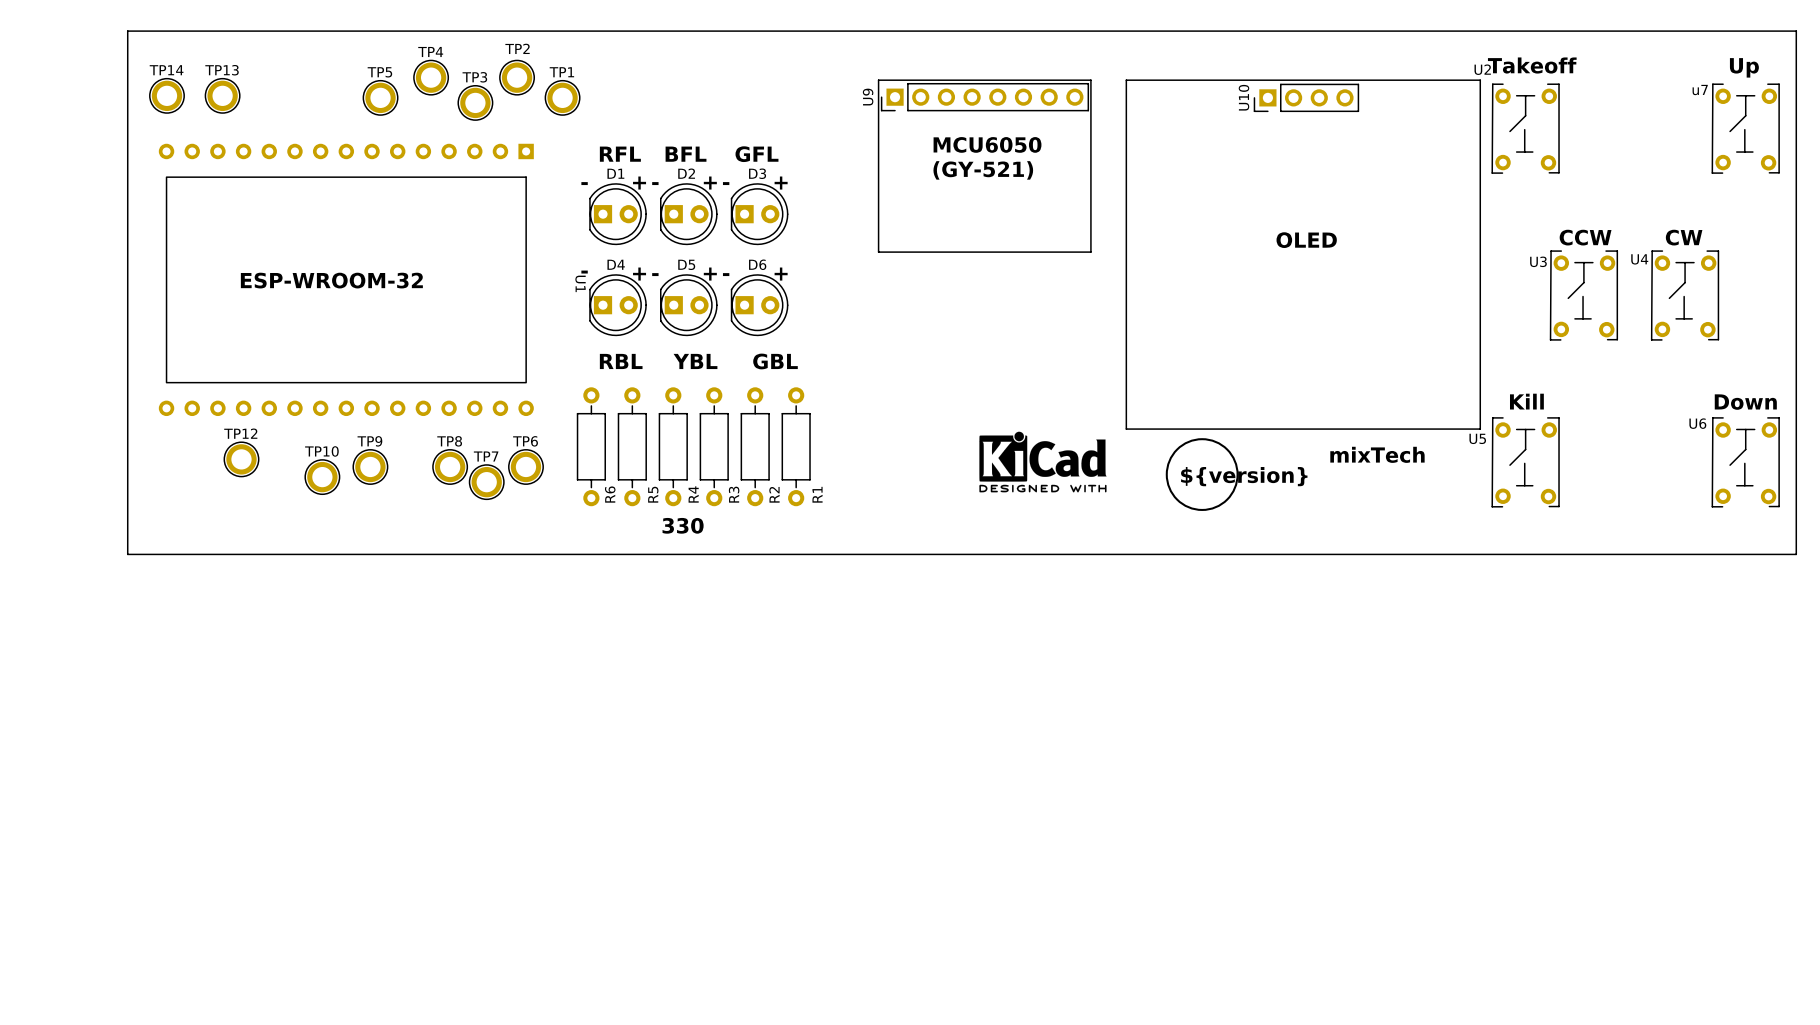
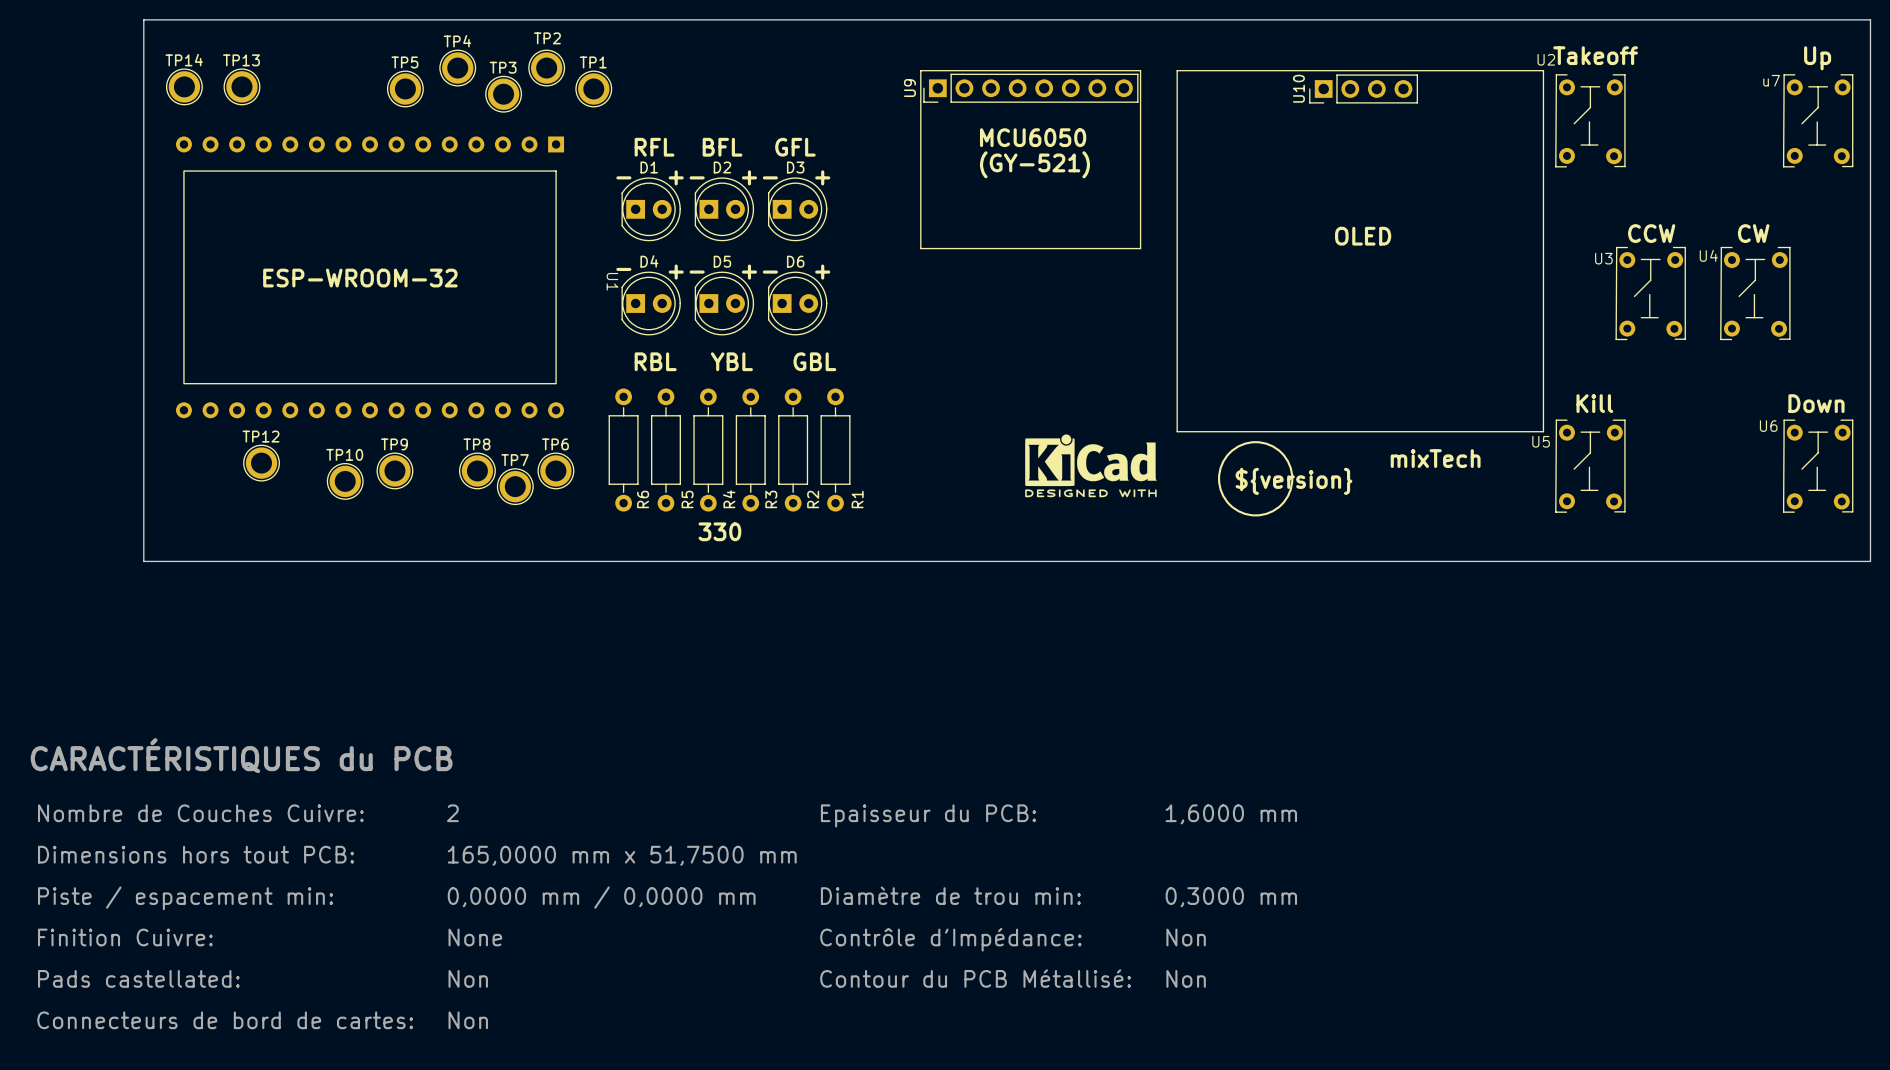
text: none -> CARACTÉRISTIQUES du PCB (241, 755)
text: none -> Nombre de Couches Cuivre: (200, 813)
text: none -> 2 (452, 813)
text: none -> 1,6000 mm (1231, 814)
text: none -> Epaisseur du PCB: (928, 815)
text: none -> Dimensions hors tout PCB: (196, 854)
text: none -> 165,0000 mm x 51,7500 mm (622, 855)
text: none -> Diamètre de trou min: (950, 895)
text: none -> 0,0000 mm / 0,0000 mm (601, 897)
text: none -> 0,3000 mm (1231, 897)
text: none -> Piste / espacement min: (185, 898)
text: none -> Finition Cuivre: (125, 937)
text: none -> None (475, 937)
text: none -> Non (1186, 937)
text: none -> Contrôle d'Impédance: (950, 939)
text: none -> Pads castellated: (138, 978)
text: none -> Non (468, 978)
text: none -> Contour du PCB Métallisé: (975, 978)
text: none -> Non (1186, 978)
text: none -> Connecteurs de bord de cartes: (225, 1020)
text: none -> Non (468, 1020)

